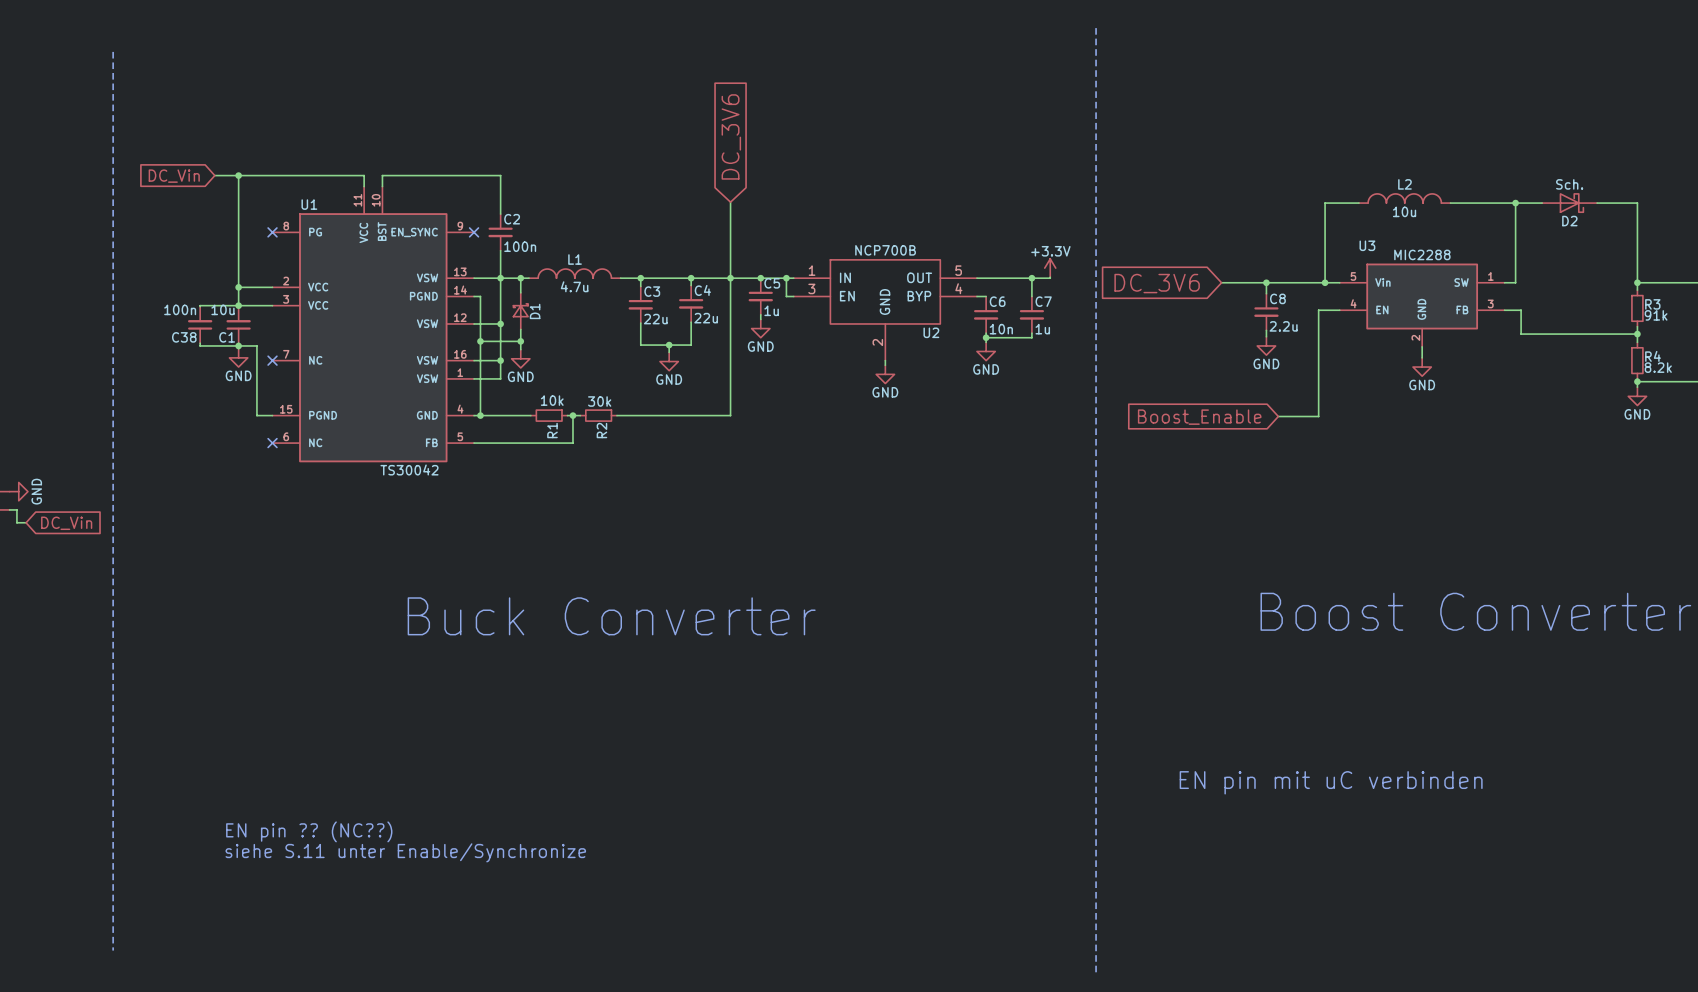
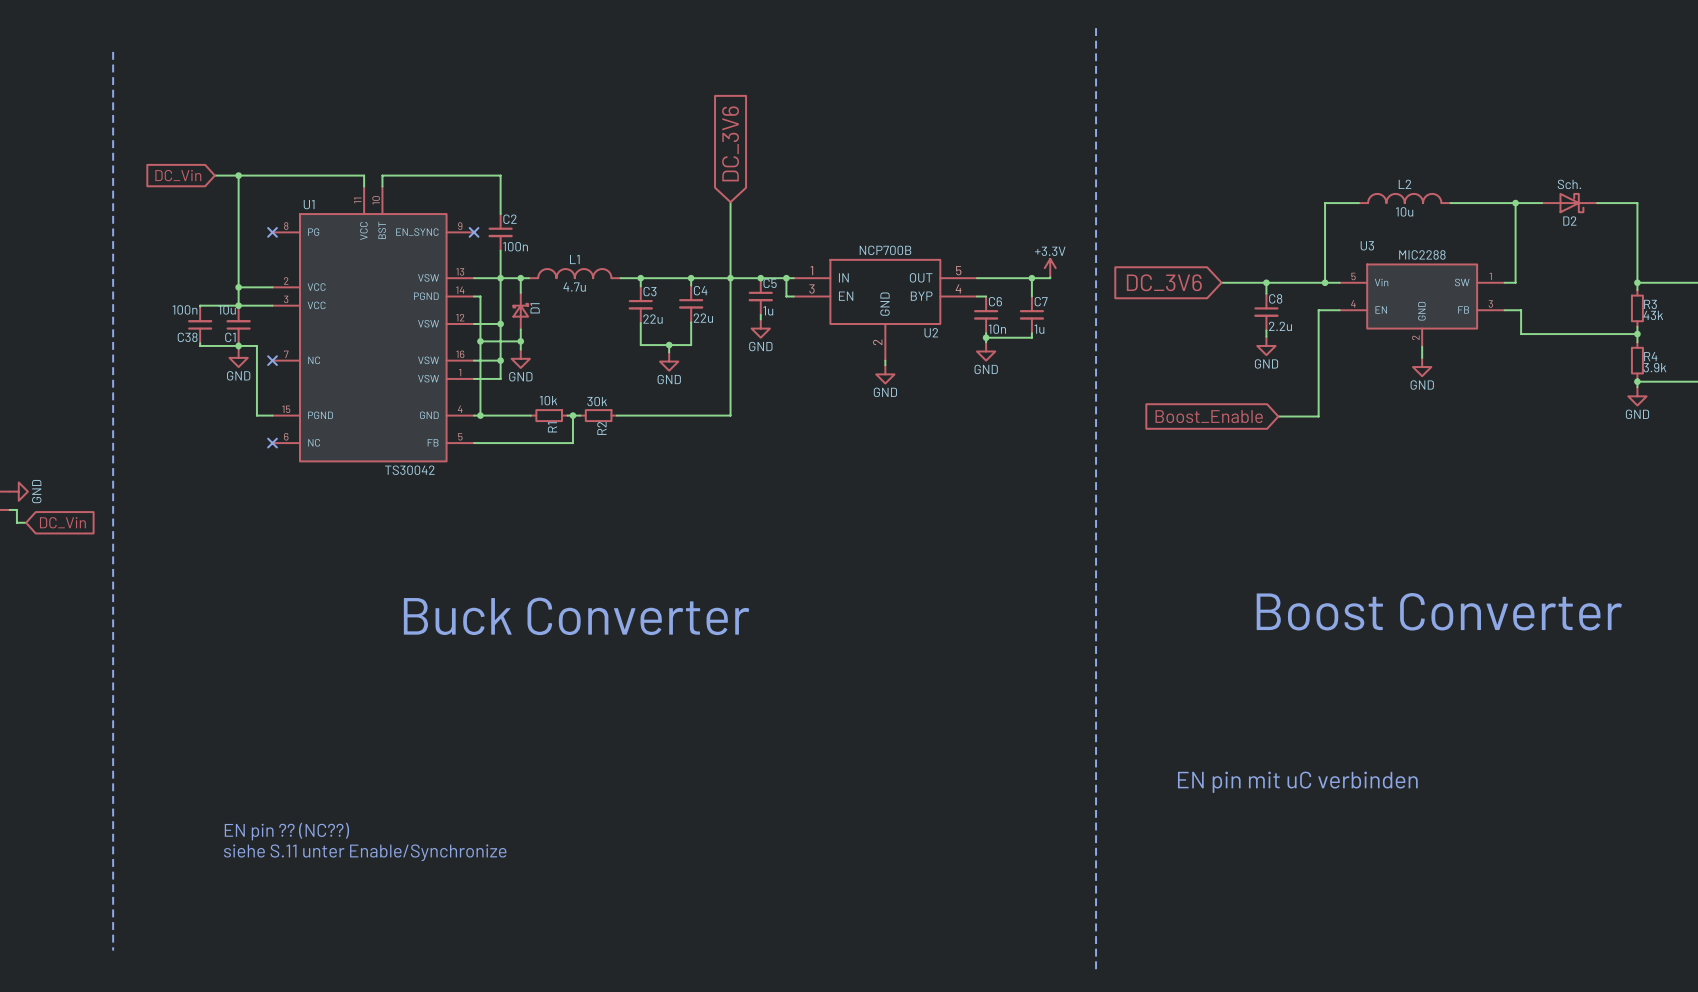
R3 value: 91k (1656, 315) -> 43k (1653, 315)
R4 value: 8.2k (1658, 367) -> 3.9k (1654, 367)

